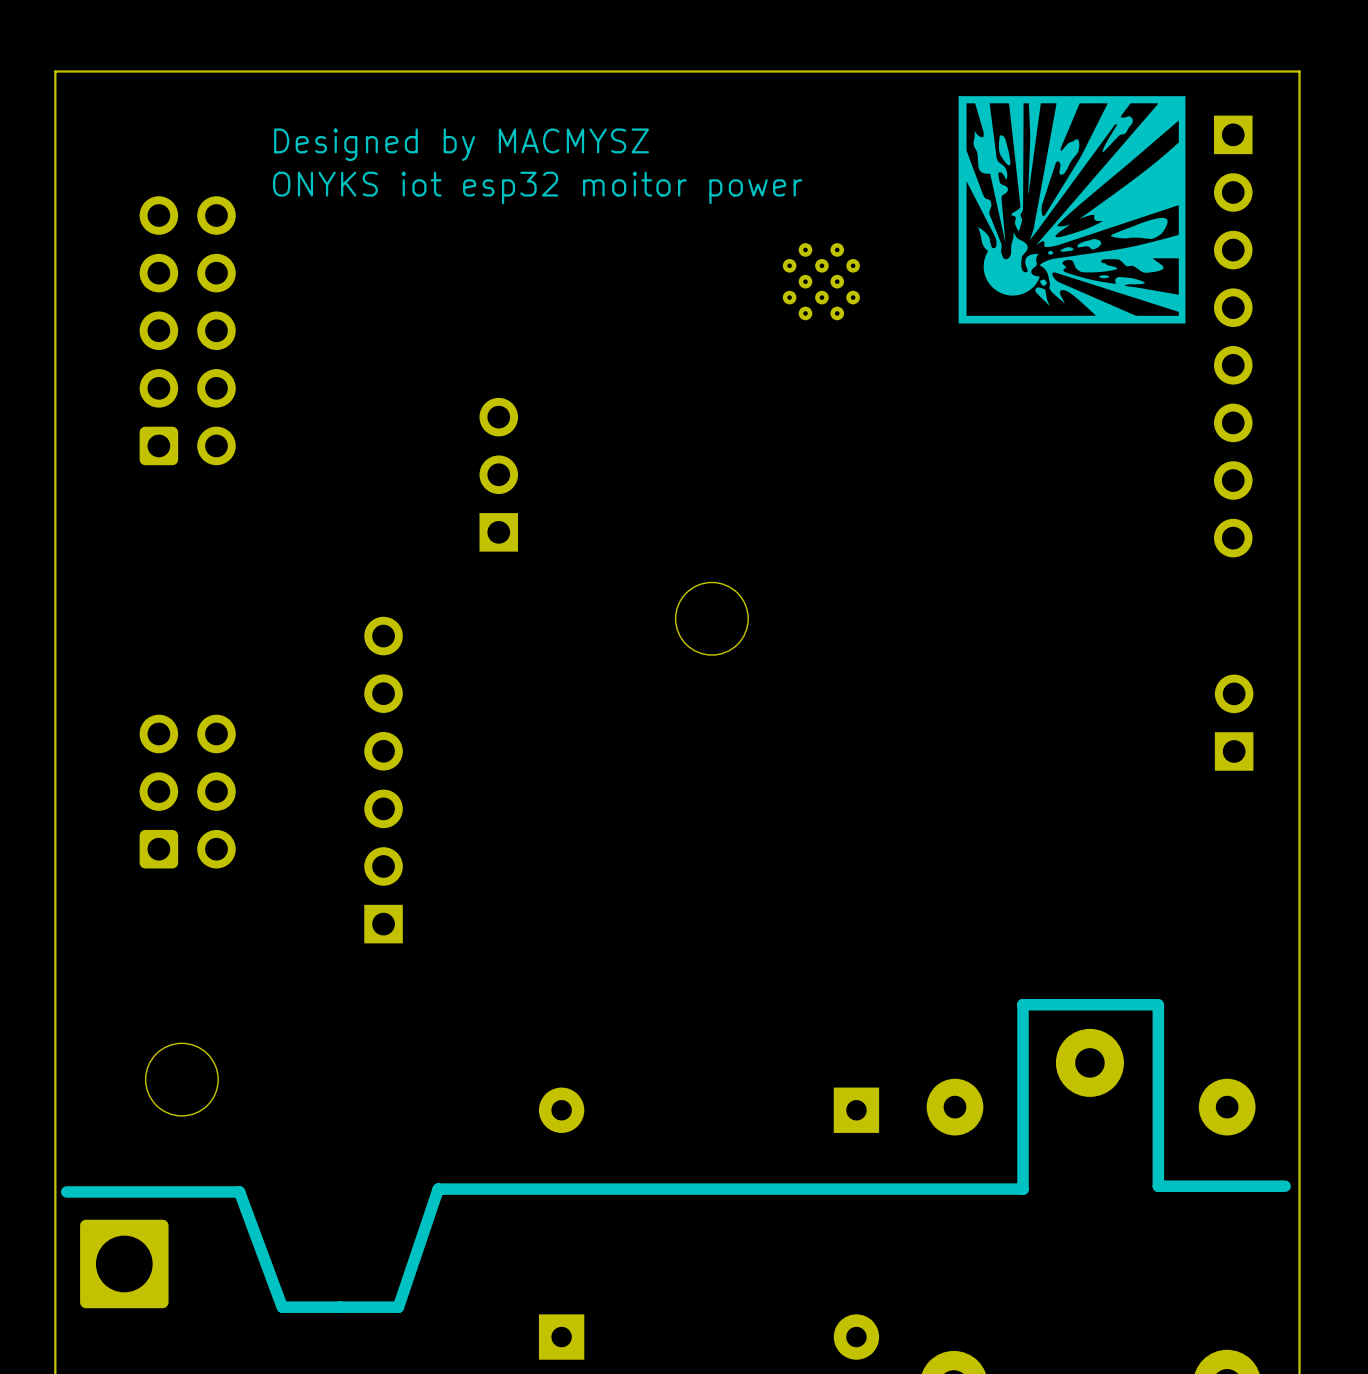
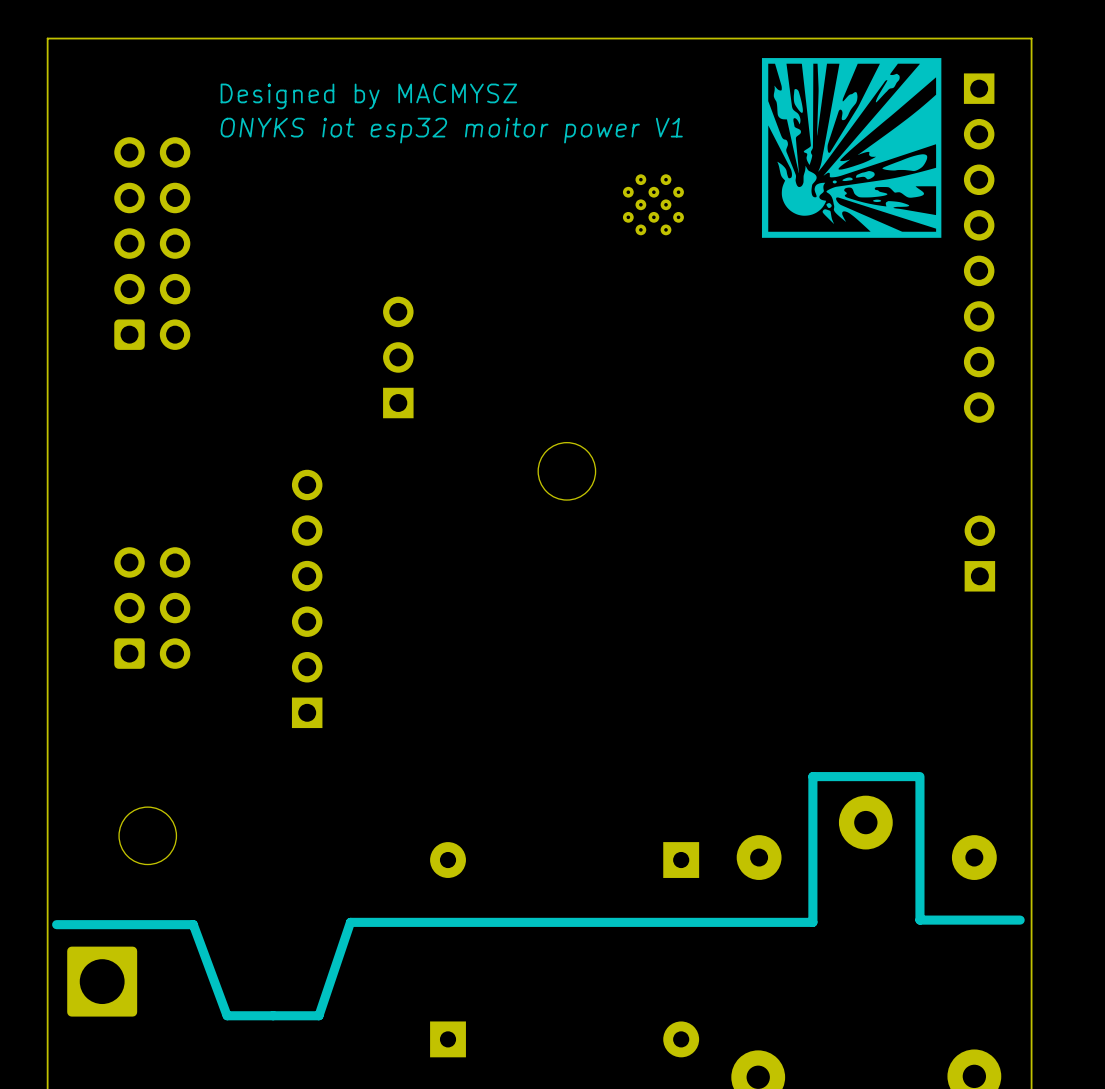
text: ONYKS iot esp32 moitor power (537, 187) -> ONYKS iot esp32 moitor power V1 (451, 130)

